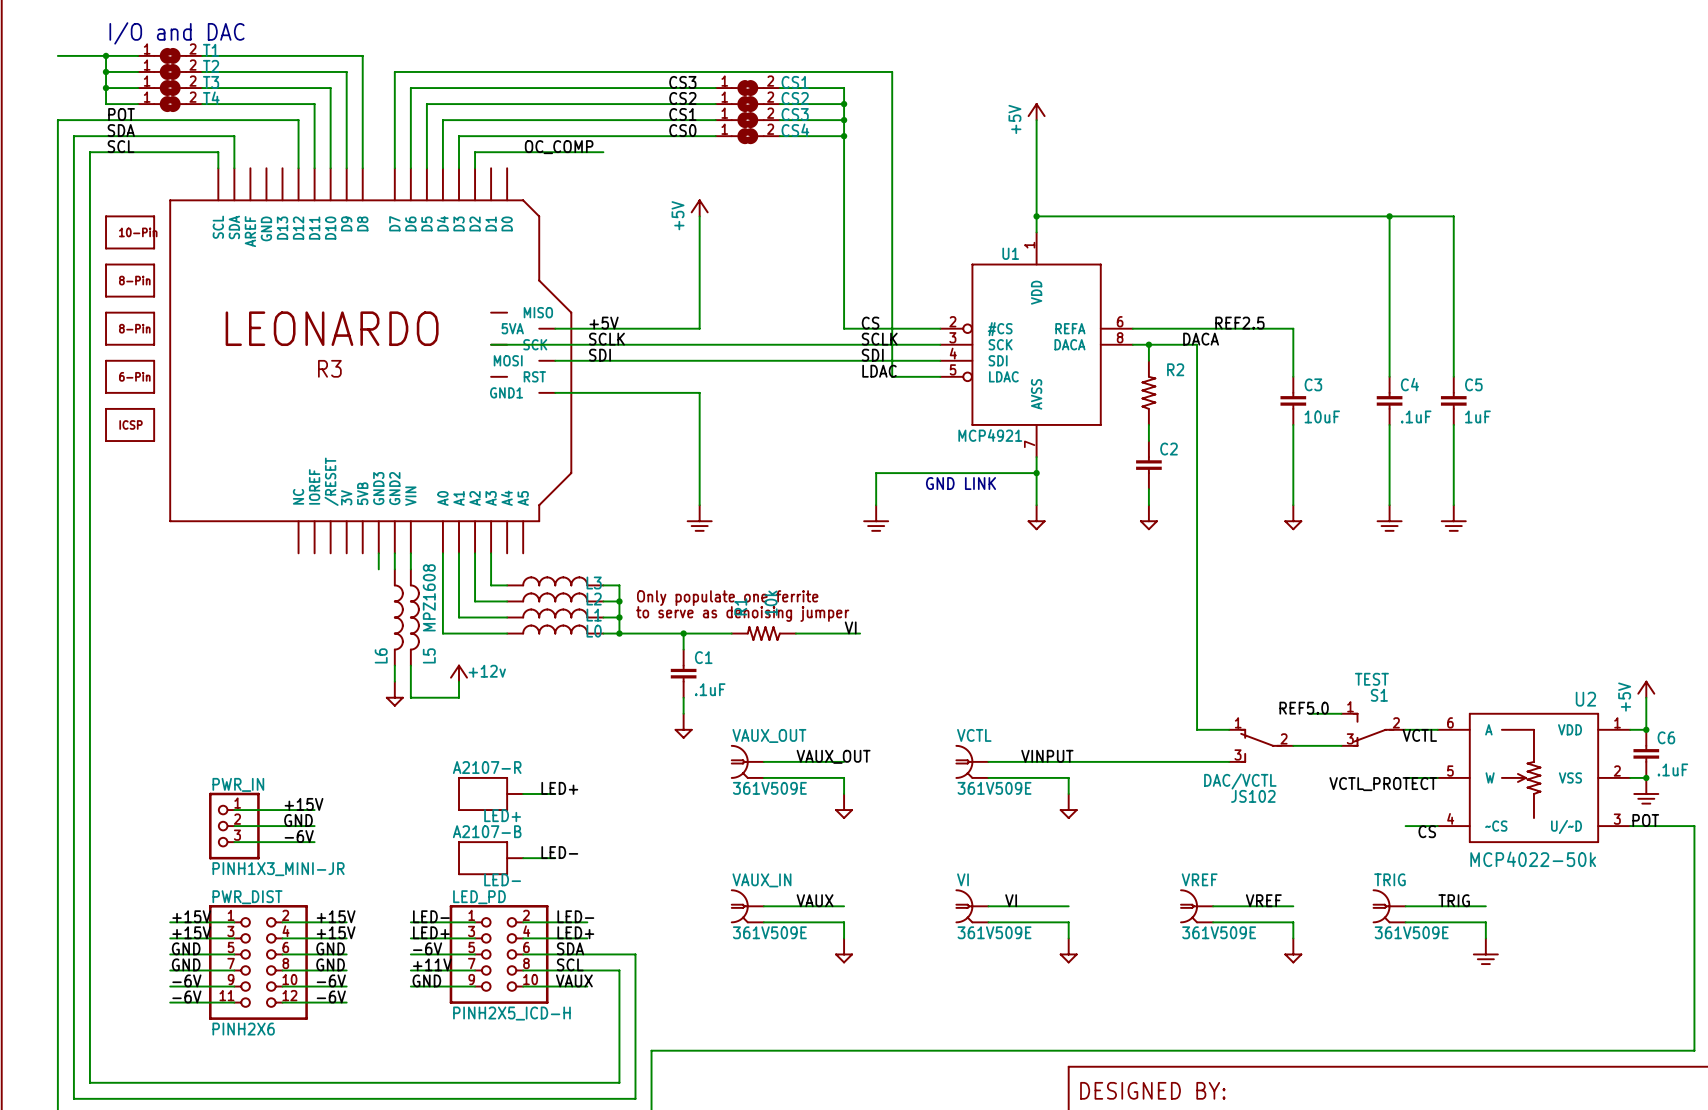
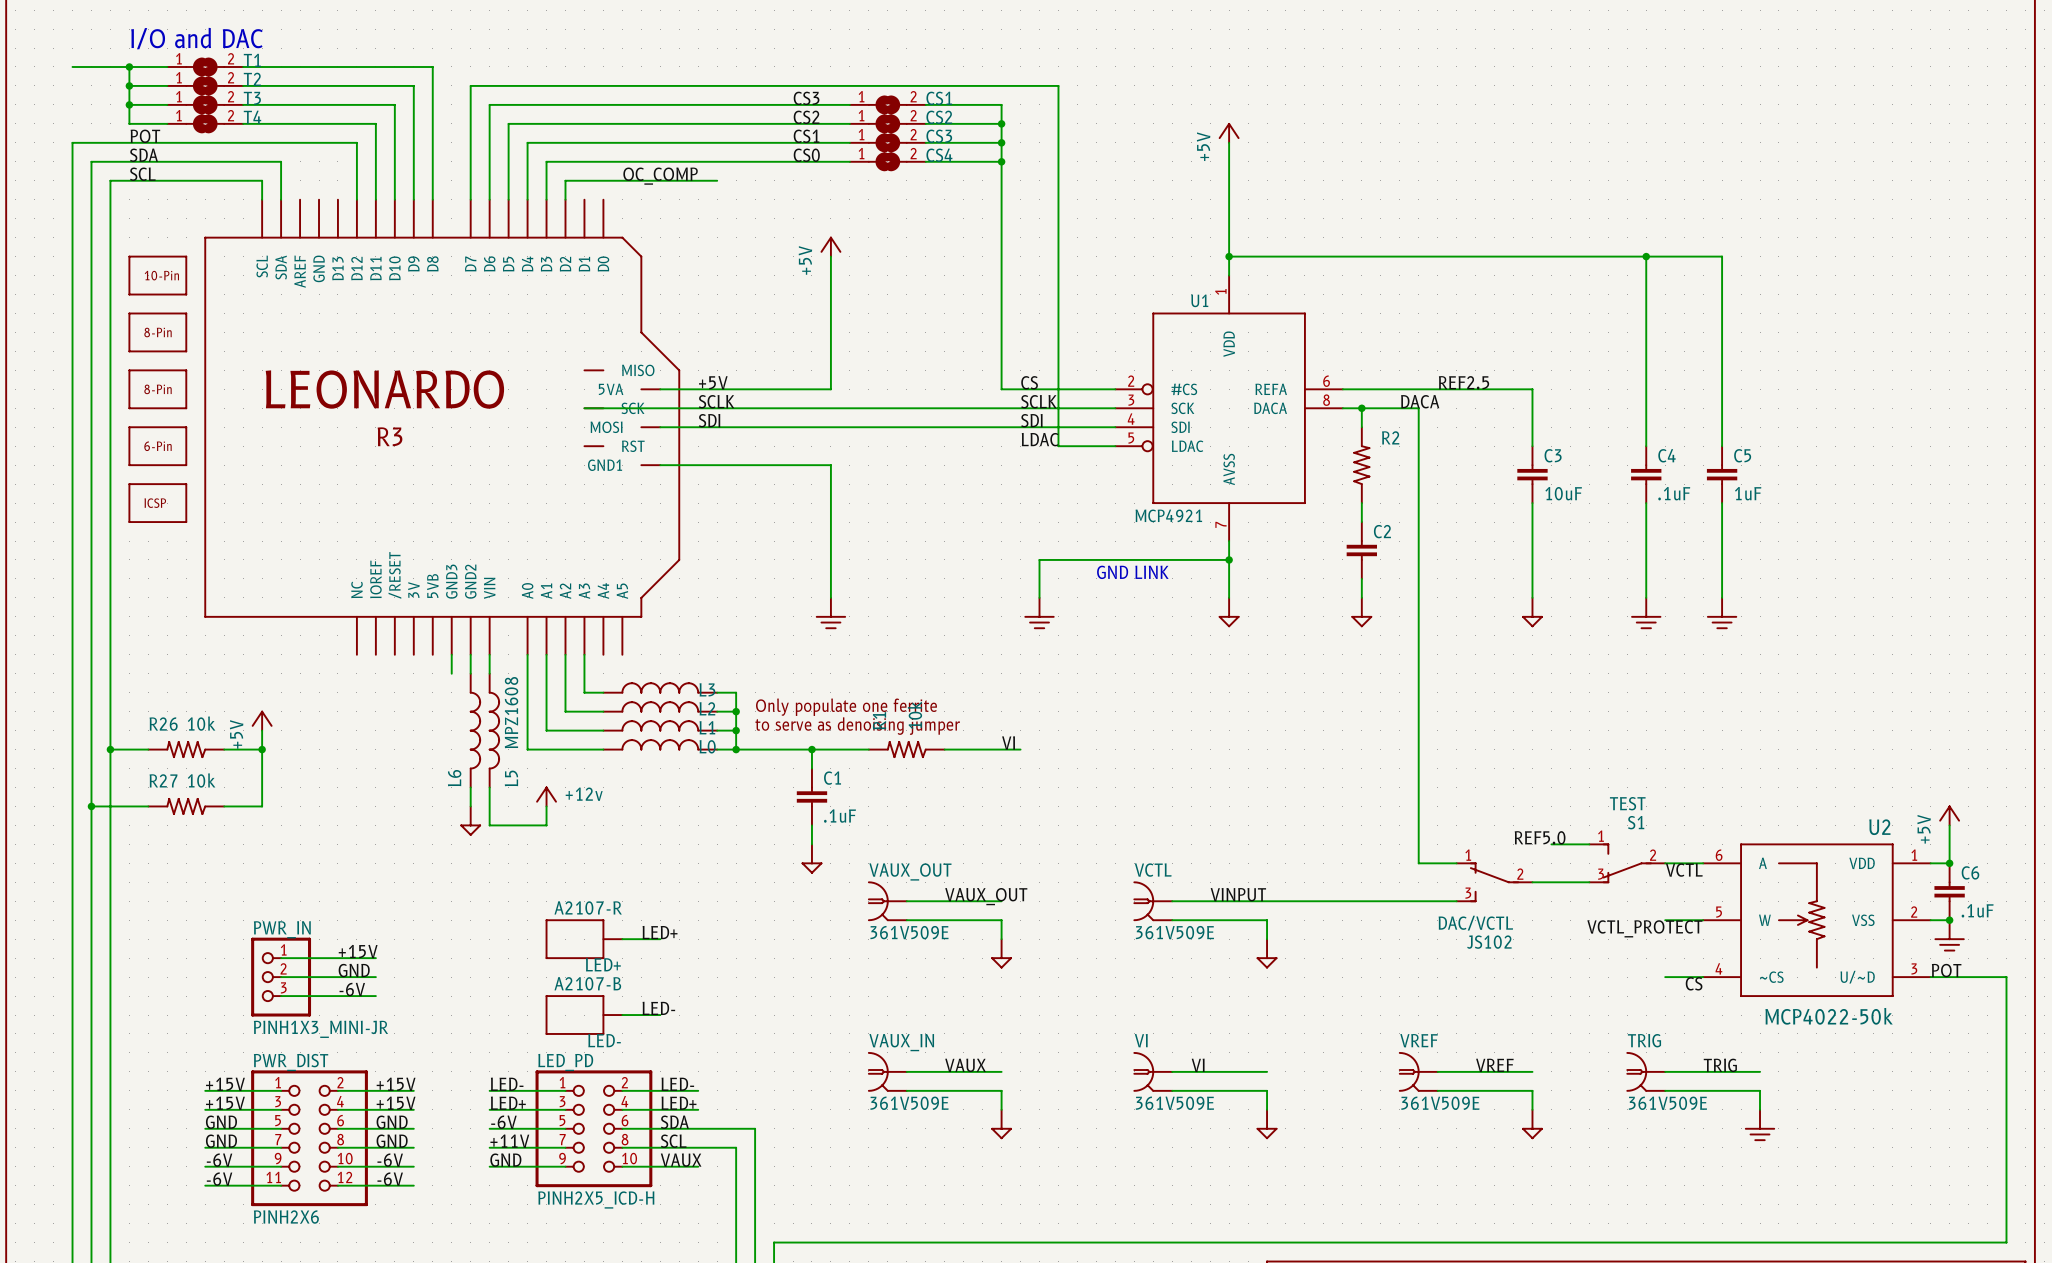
part: none -> +5V (262, 721)
wire: none -> (262, 730) (262, 806) (224, 806)
wire: none -> (110, 749) (148, 749)
junction: none -> (110, 749)
R26: none -> 10k (186, 749)
wire: none -> (224, 749) (262, 749)
junction: none -> (262, 749)
wire: none -> (91, 806) (148, 806)
junction: none -> (91, 806)
R27: none -> 10k (186, 806)

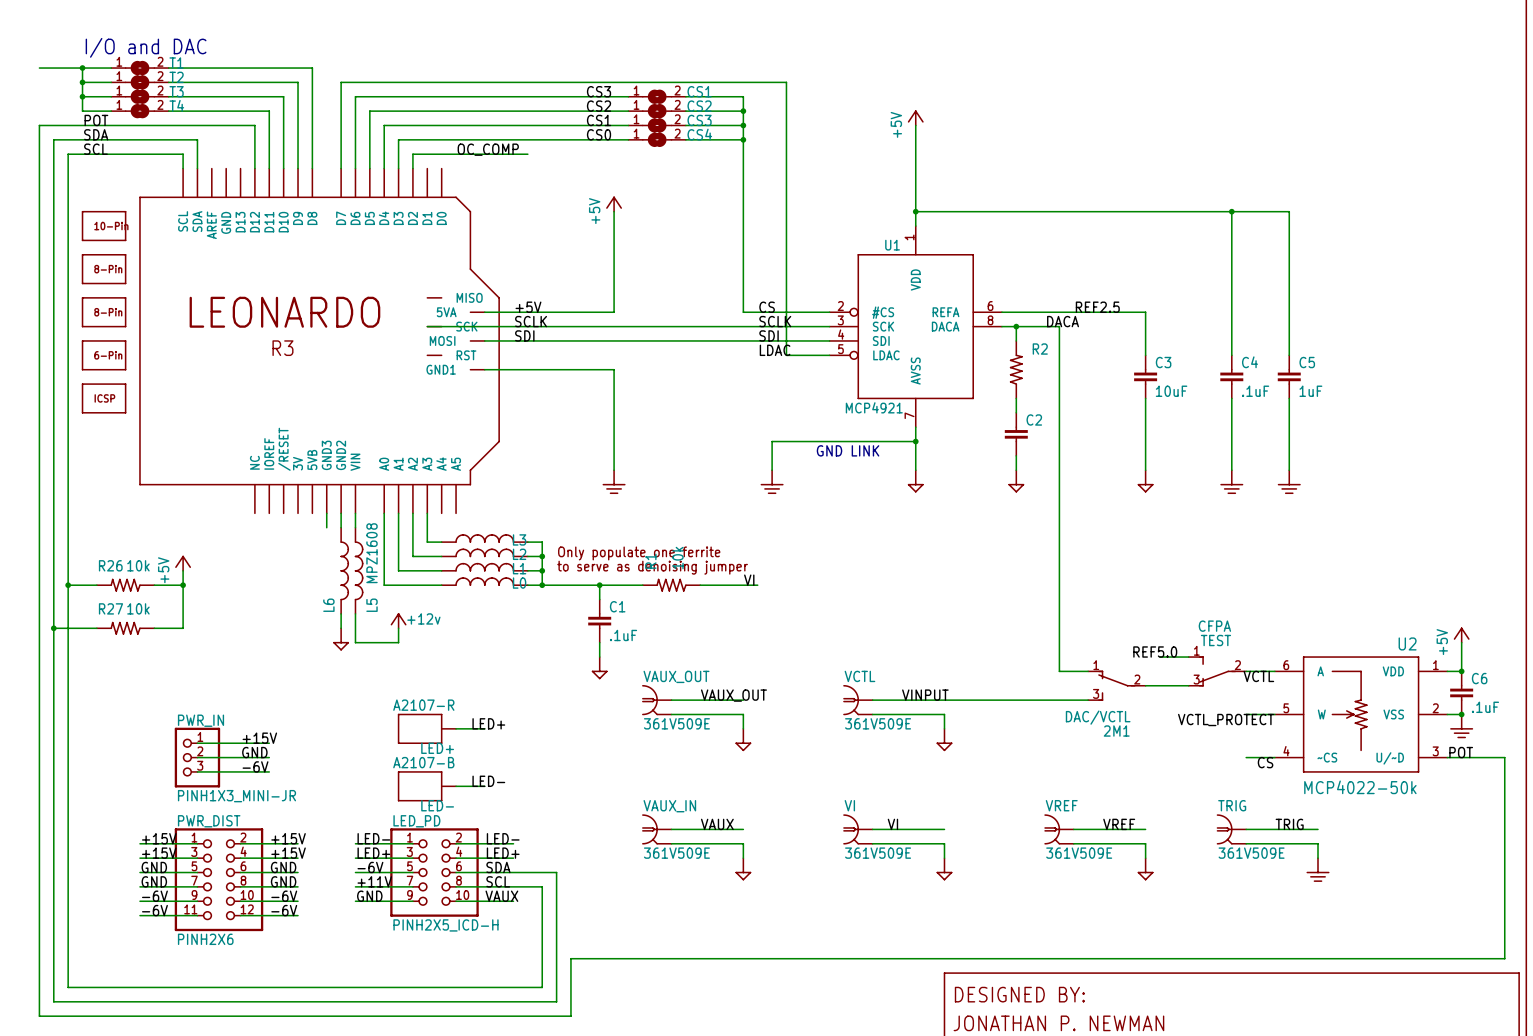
S1 value: TEST (1627, 803) -> CFPA (1214, 626)
S1 name: S1 (1636, 822) -> TEST (1215, 640)
DAC/VCTL value: JS102 (1489, 942) -> 2M1 (1116, 731)

